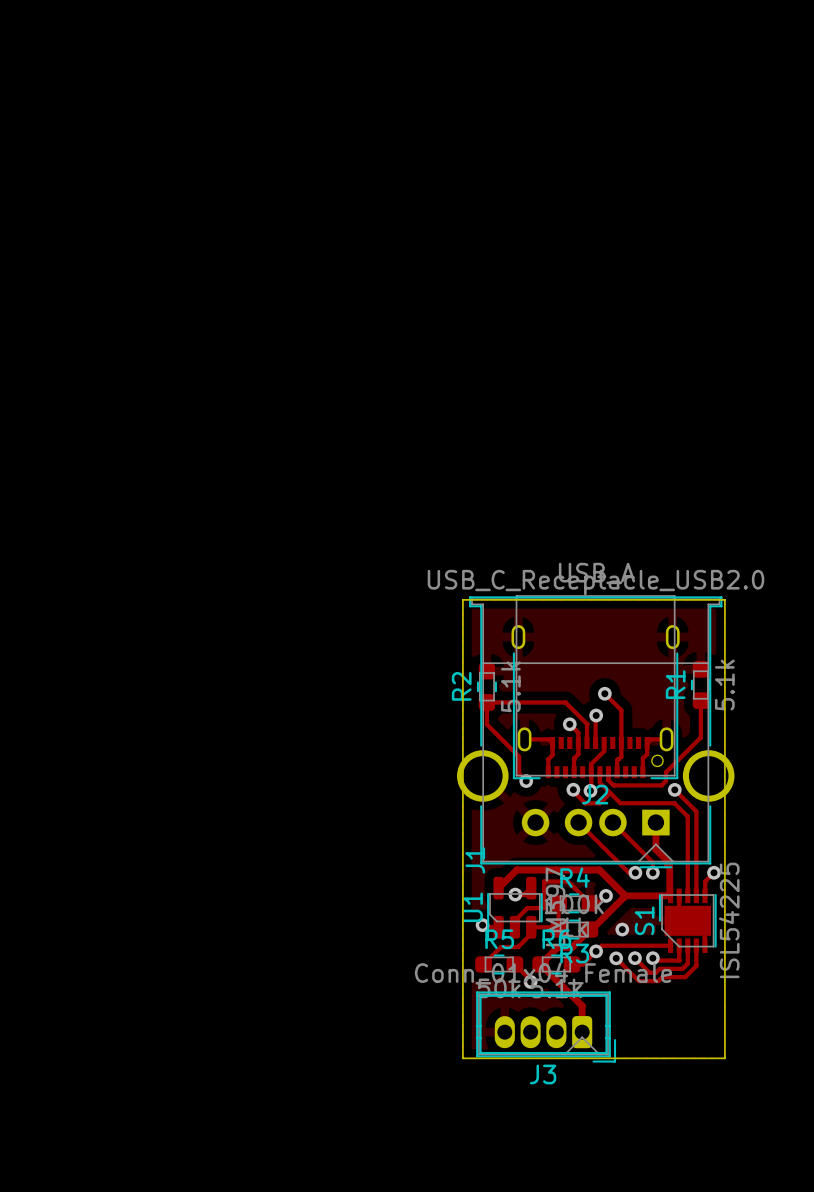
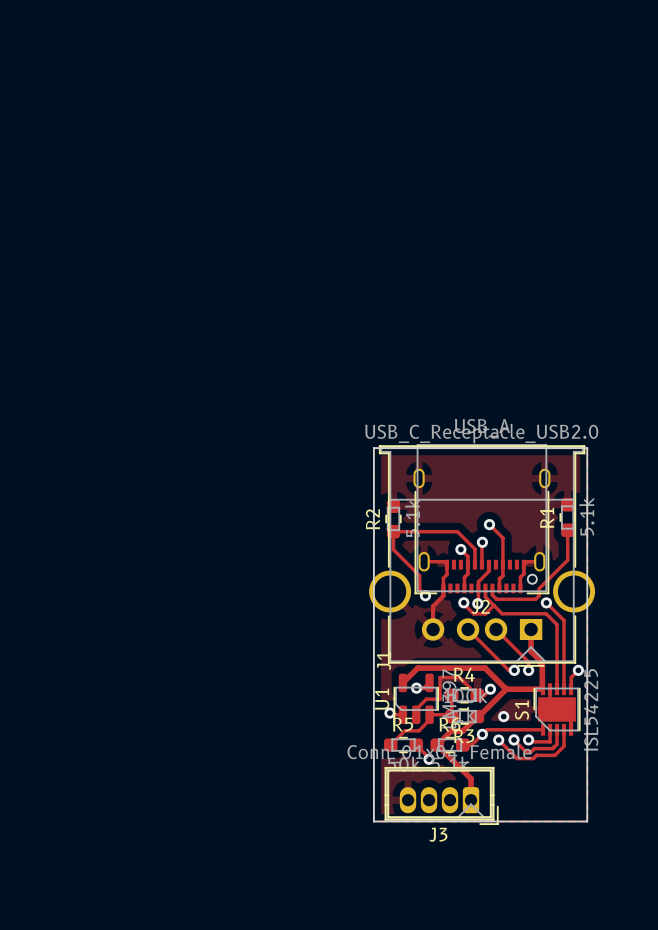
track: none -> (443, 588) (443, 595) (432, 606)
track: none -> (433, 606) (433, 629)

